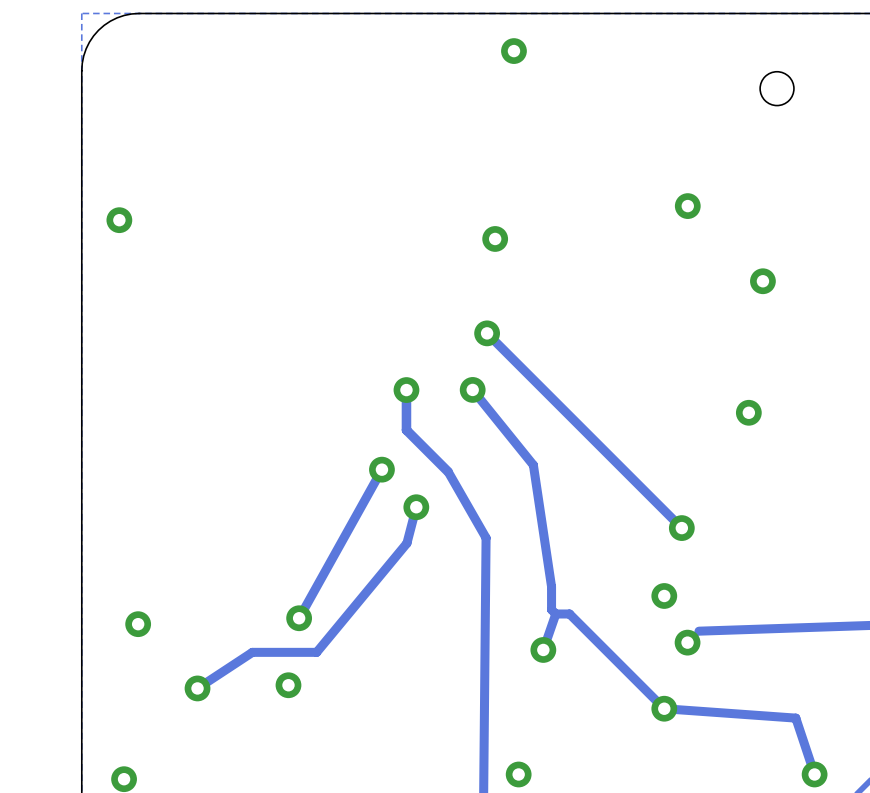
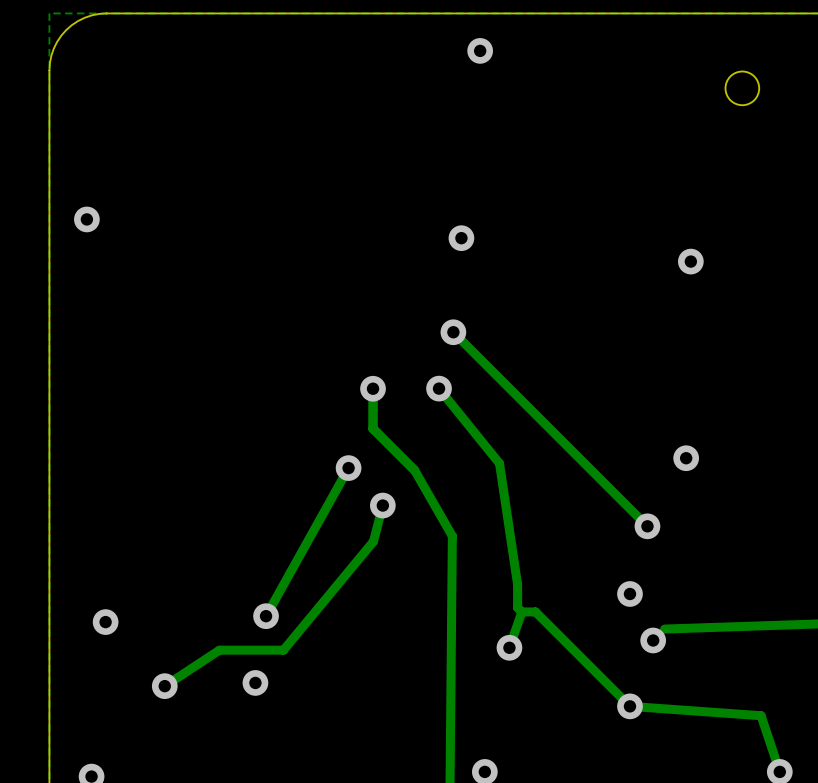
via: (687, 206) -> none
via: none -> (690, 261)
via: (762, 281) -> none
via position: (748, 412) -> (686, 458)

